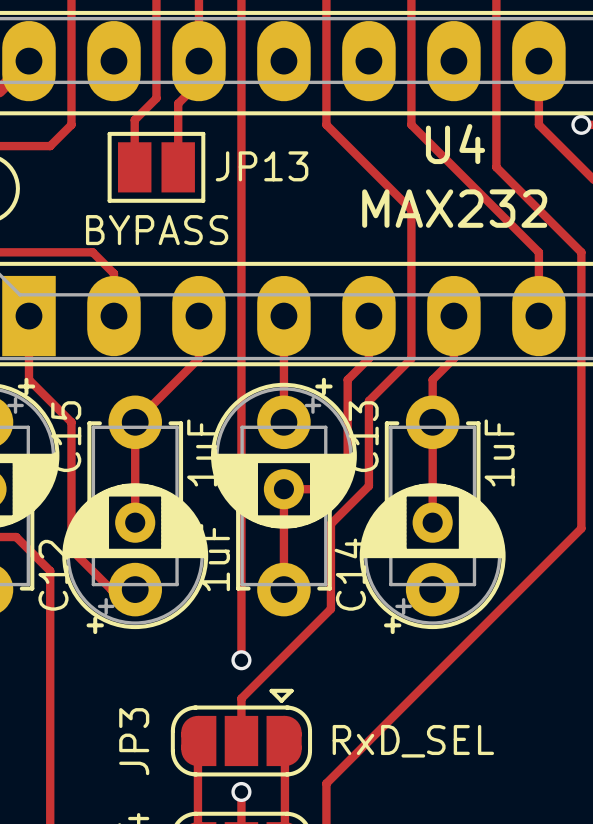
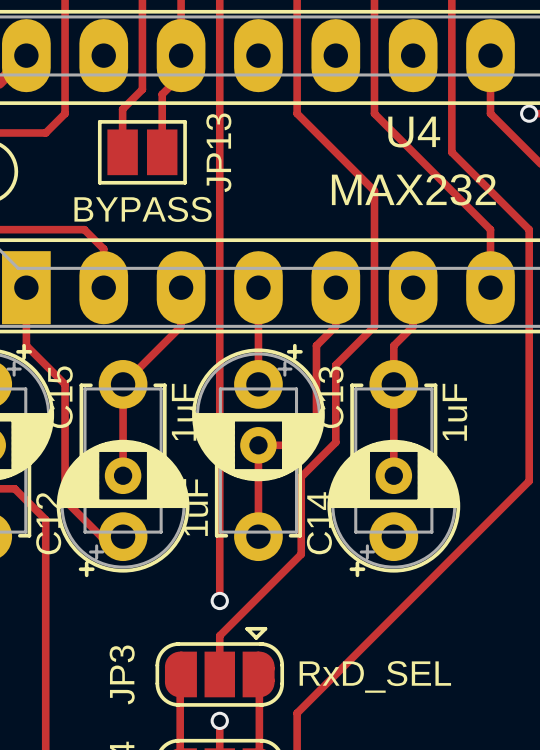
JP13 name rotation: 0° (262, 166) -> 90° counterclockwise (218, 152)

